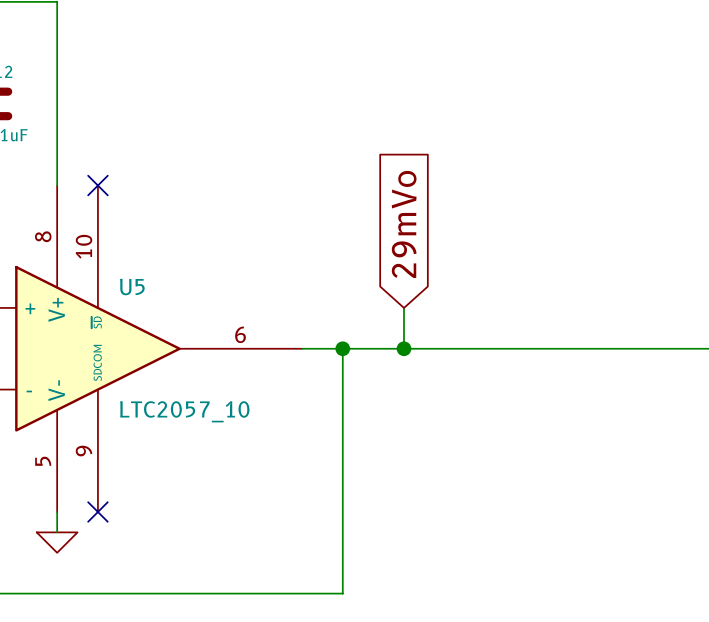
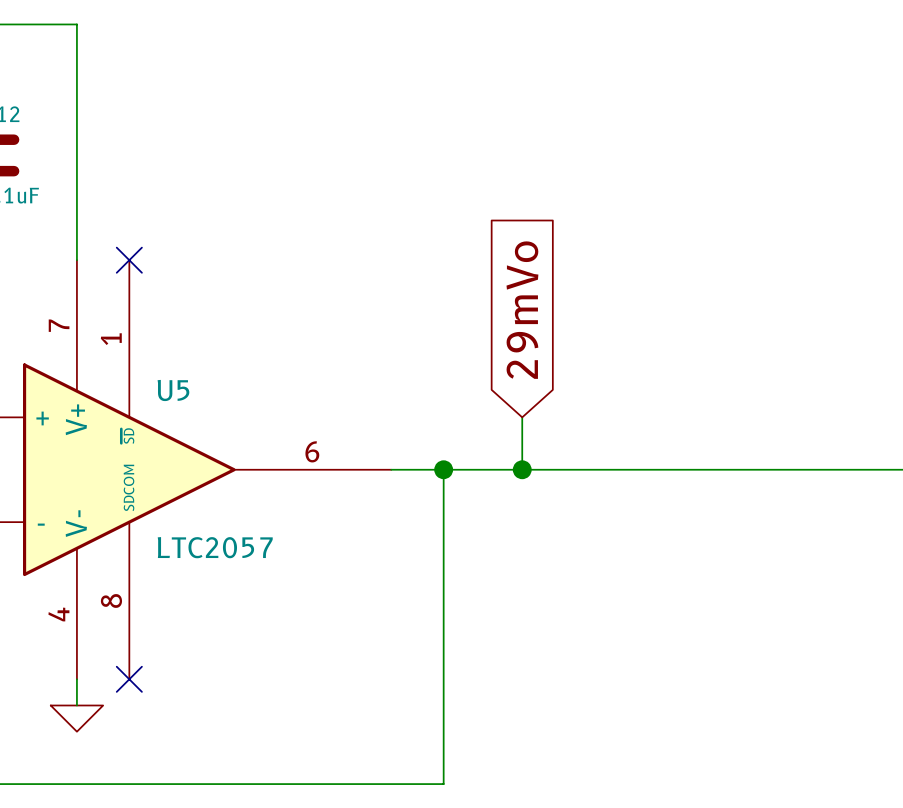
U5 pin number: 8 (43, 236) -> 7 (59, 325)
U5 pin number: 10 (84, 246) -> 1 (111, 339)
U5 value: LTC2057_10 (184, 411) -> LTC2057 (215, 547)
U5 pin number: 9 (84, 451) -> 8 (111, 600)
U5 pin number: 5 (43, 461) -> 4 (58, 614)

